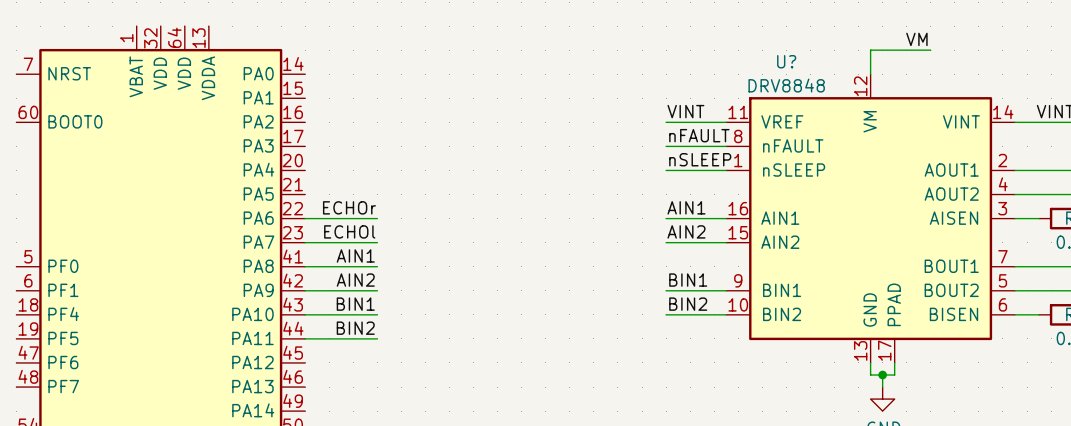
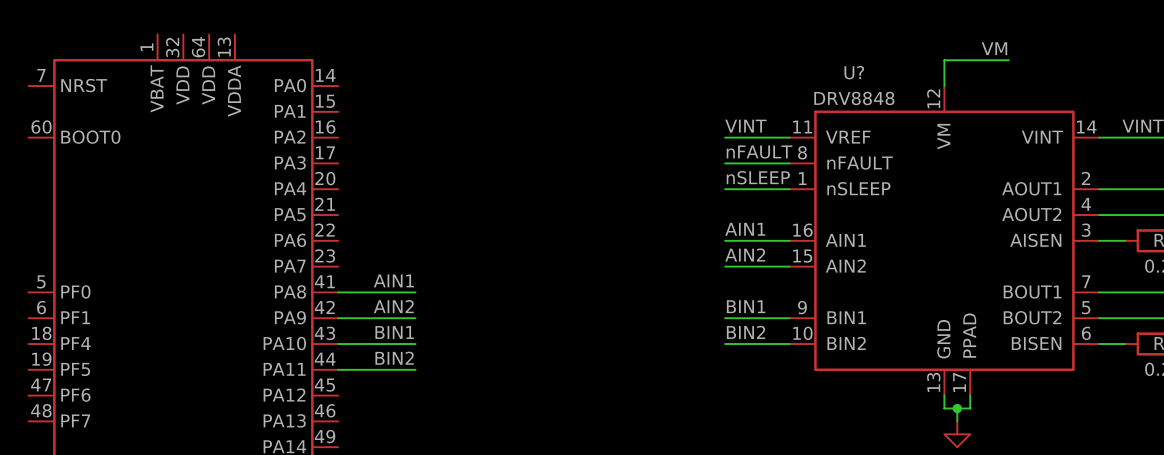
label: ECHOr (349, 207) -> none
wire: (305, 218) (377, 218) -> none
label: ECHOl (349, 231) -> none
wire: (305, 242) (377, 242) -> none

